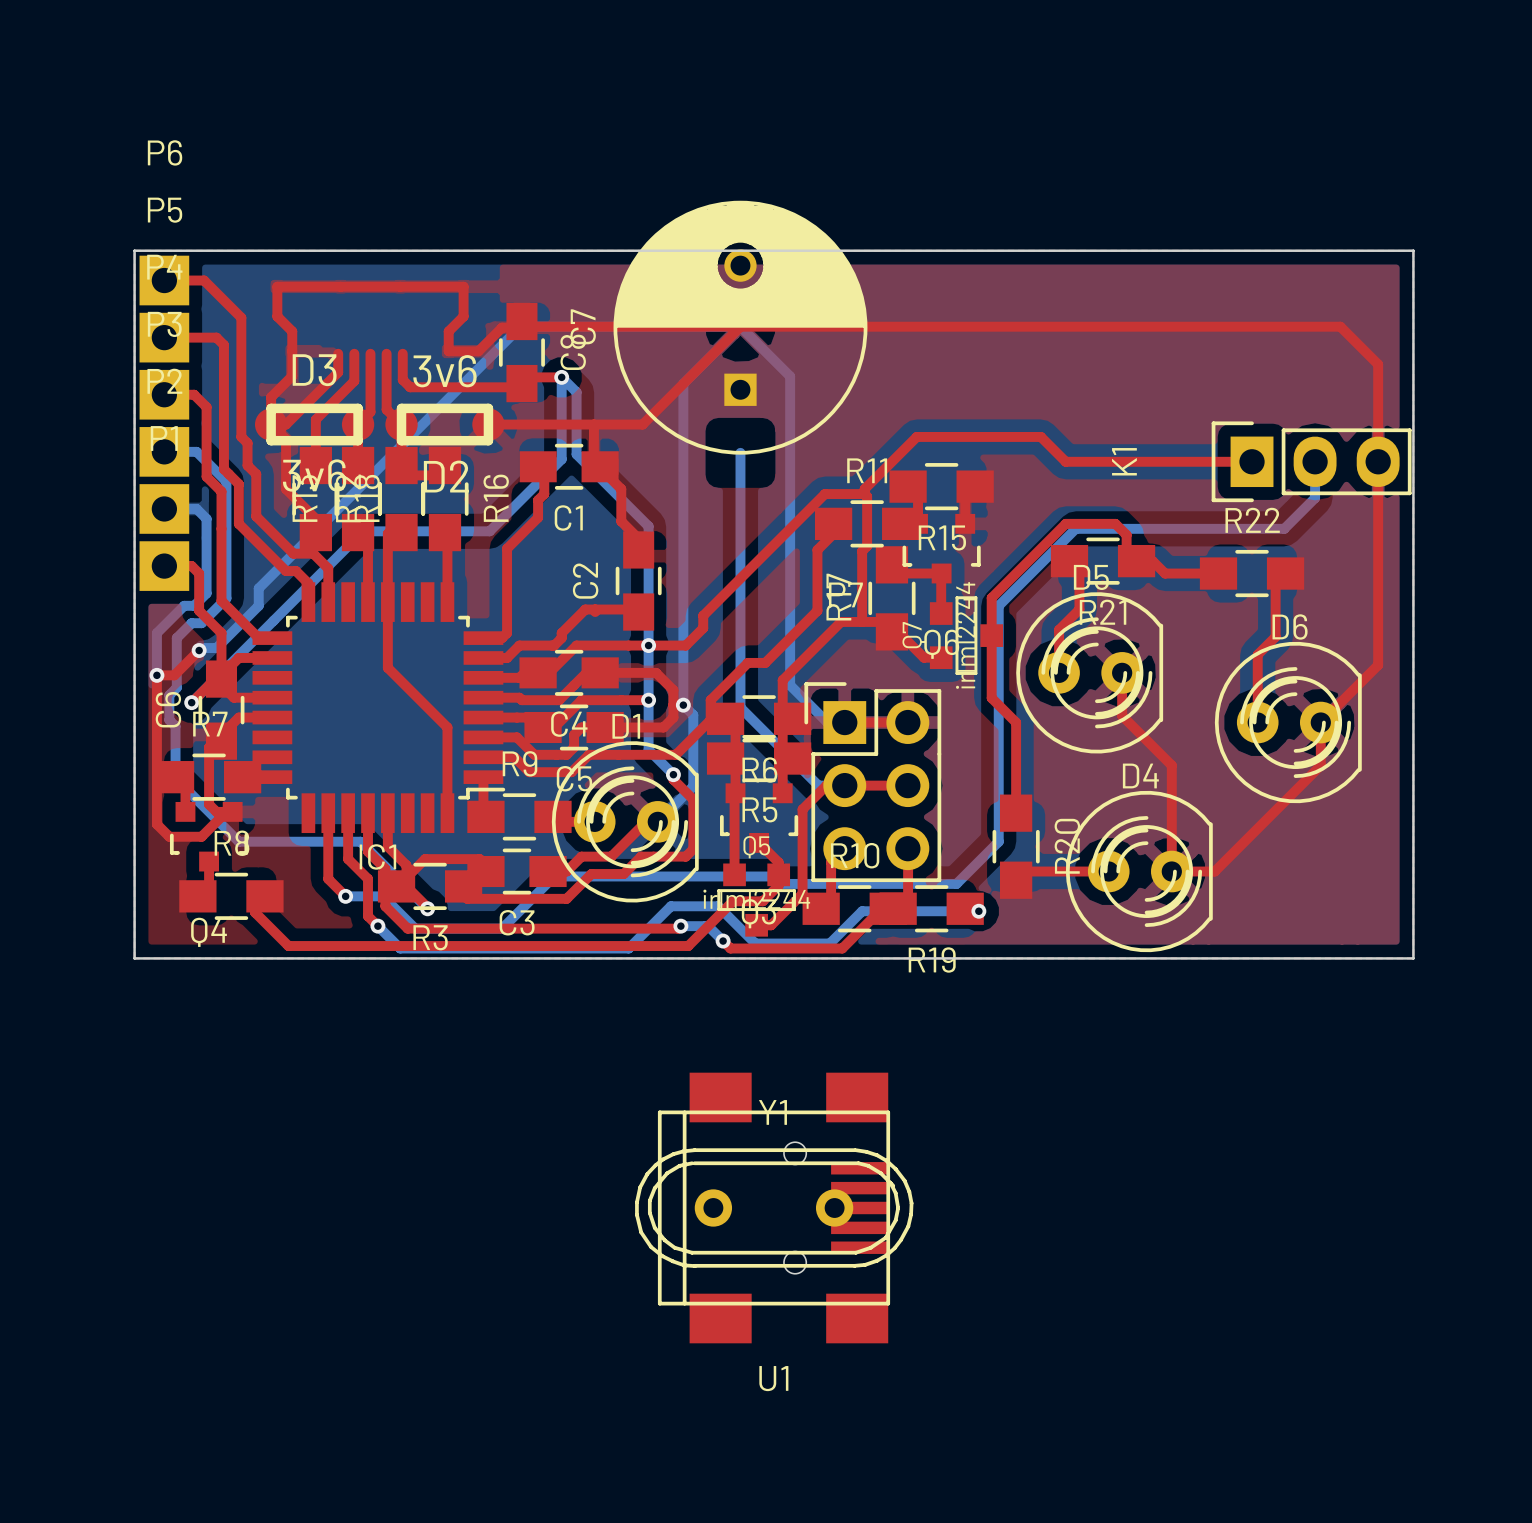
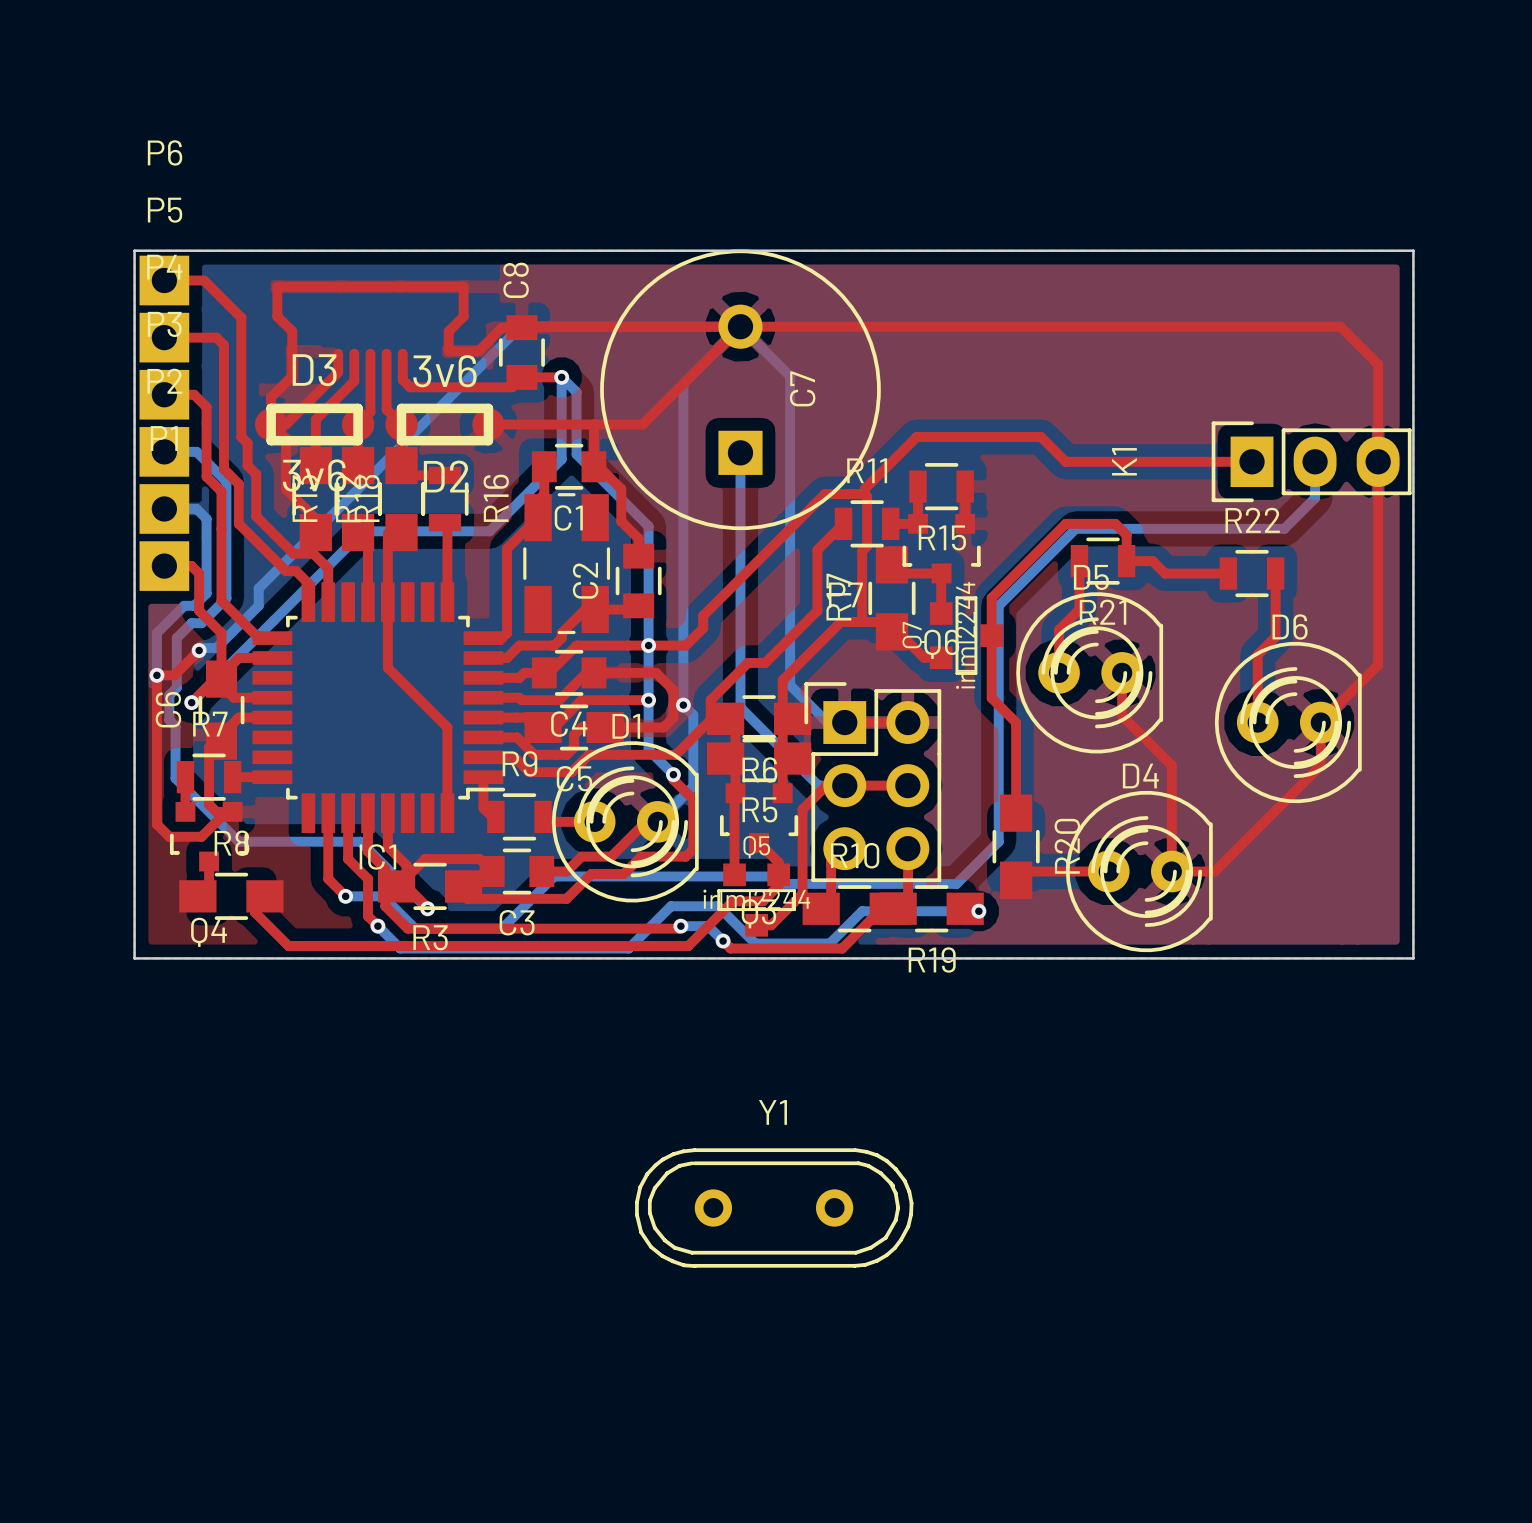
C7 footprint: [613, 200, 868, 455] -> [600, 249, 881, 531]
C8 footprint: [498, 302, 545, 403] -> [498, 315, 545, 390]
C7 name position: C7 (583, 326) -> C7 (802, 388)
C8 name position: C8 (573, 352) -> C8 (516, 280)
C1 footprint: [519, 443, 619, 490] -> [531, 443, 607, 490]
R16 footprint: [421, 446, 469, 552] -> [421, 466, 469, 532]
R15 footprint: [889, 463, 994, 511] -> [909, 463, 974, 511]
R11 footprint: [814, 500, 920, 548] -> [834, 500, 900, 548]
C2 footprint: [615, 531, 662, 631] -> [615, 543, 662, 619]
R21 footprint: [1050, 537, 1156, 585] -> [1070, 537, 1136, 585]
R22 footprint: [1199, 549, 1305, 598] -> [1219, 549, 1285, 598]
part: none -> (566, 563)
C4 footprint: [519, 649, 619, 696] -> [531, 649, 607, 696]
R7 footprint: [156, 753, 262, 801] -> [176, 753, 242, 801]
R9 footprint: [467, 793, 572, 841] -> [487, 793, 552, 841]
C3 footprint: [467, 848, 567, 895] -> [479, 848, 555, 895]
U1: (774, 1207) -> none

